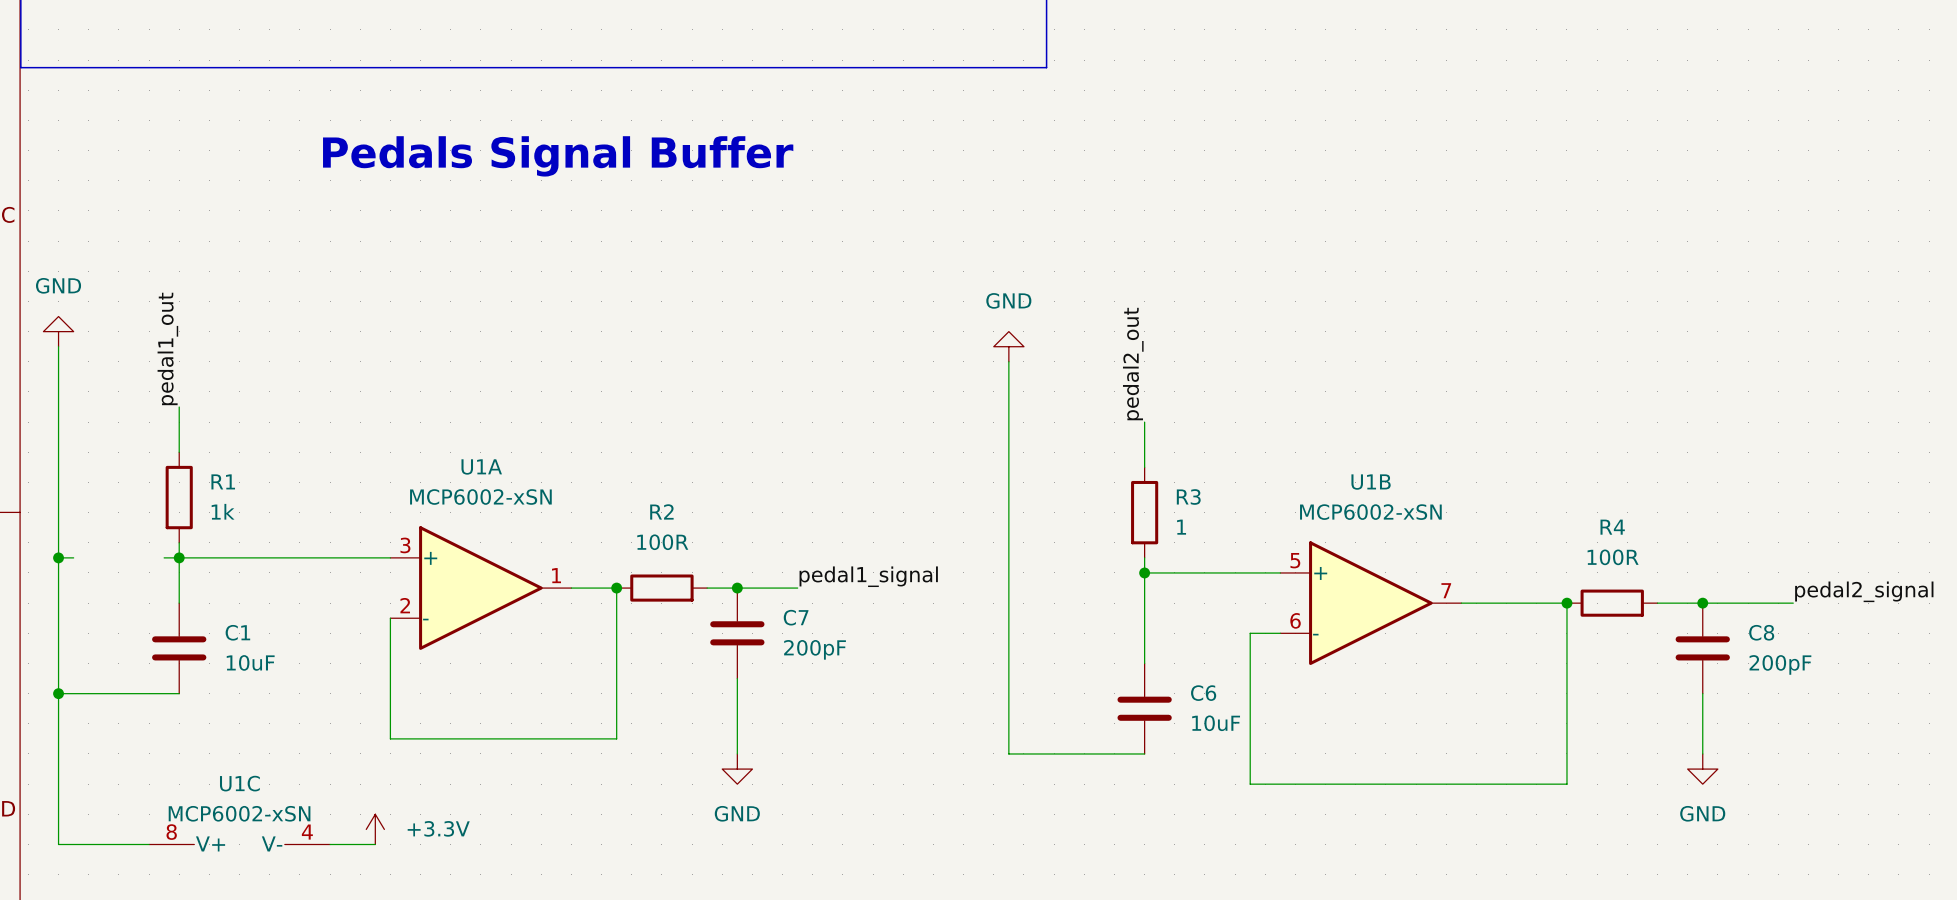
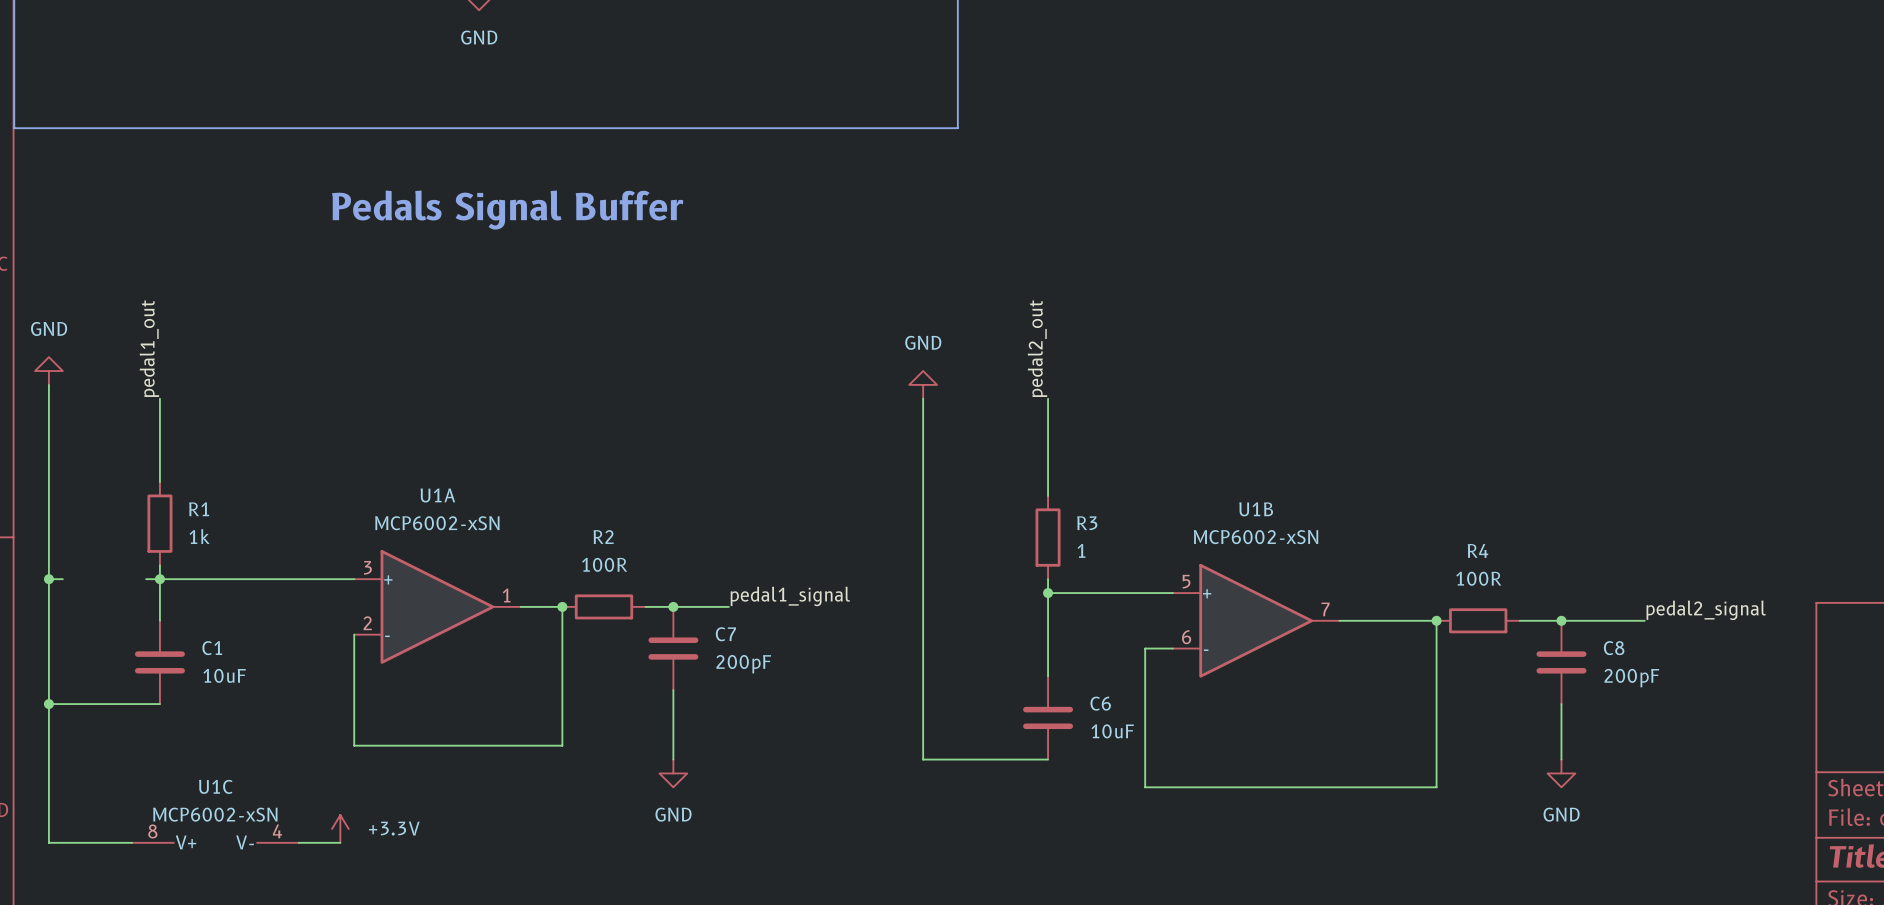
label position: pedal1_out (167, 348) -> pedal1_out (149, 348)
wire: none -> (159, 398) (159, 440)
wire: none -> (1048, 398) (1048, 454)
label position: pedal2_out (1133, 364) -> pedal2_out (1037, 348)

